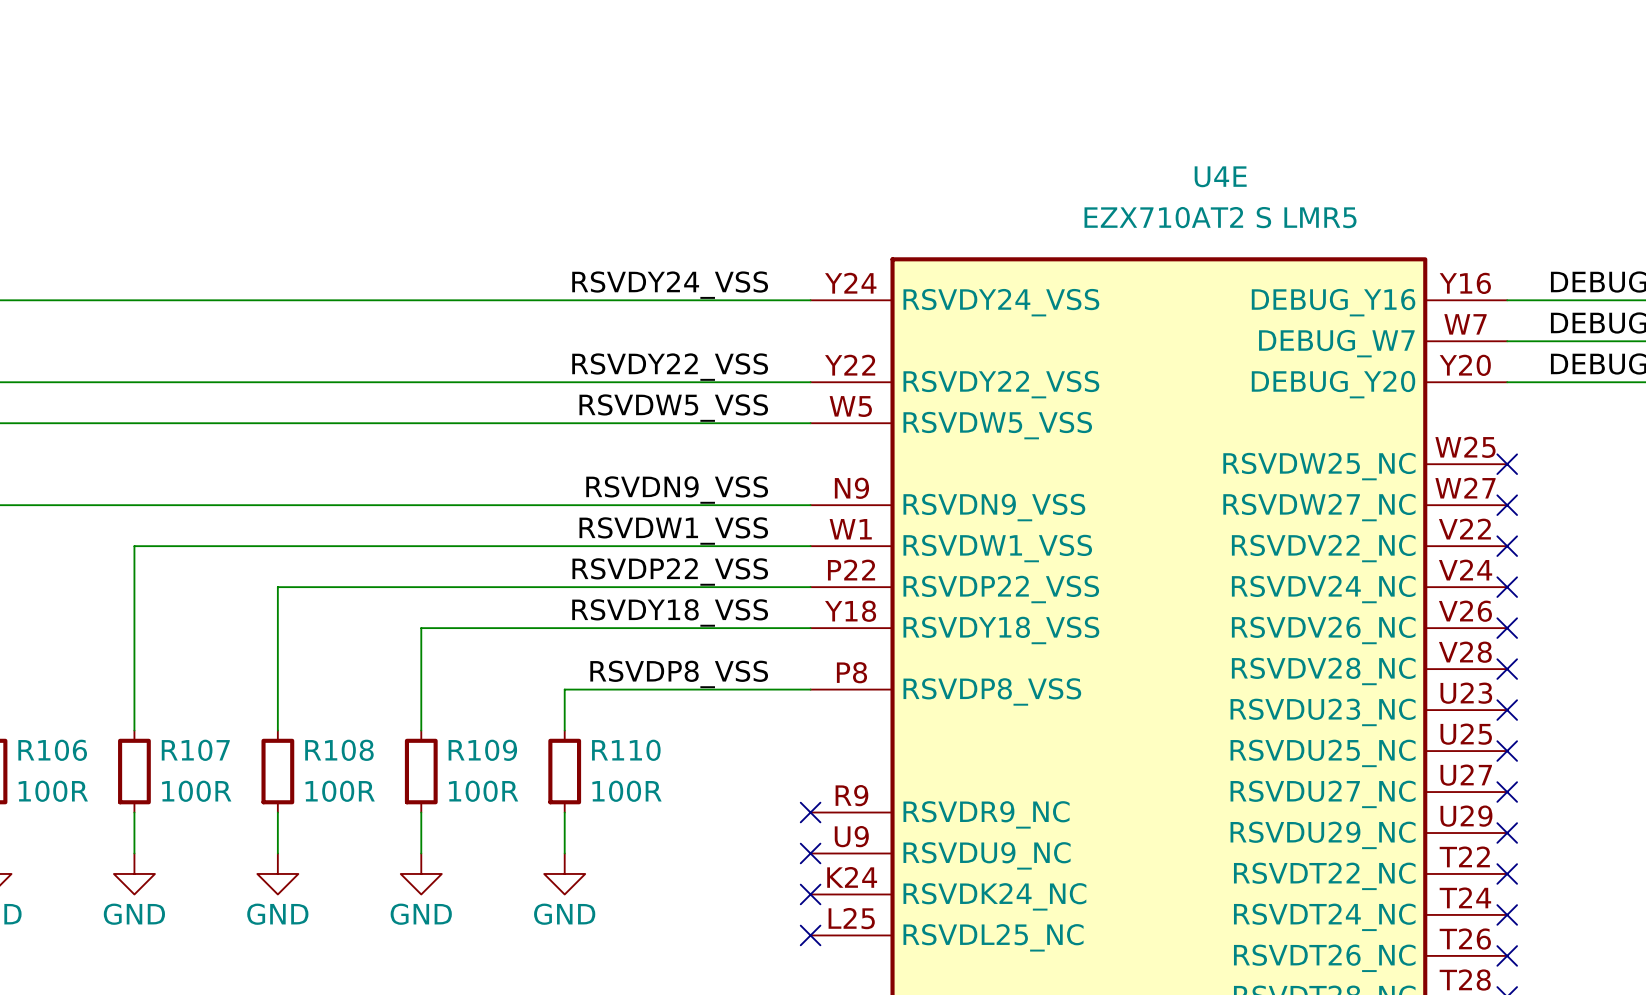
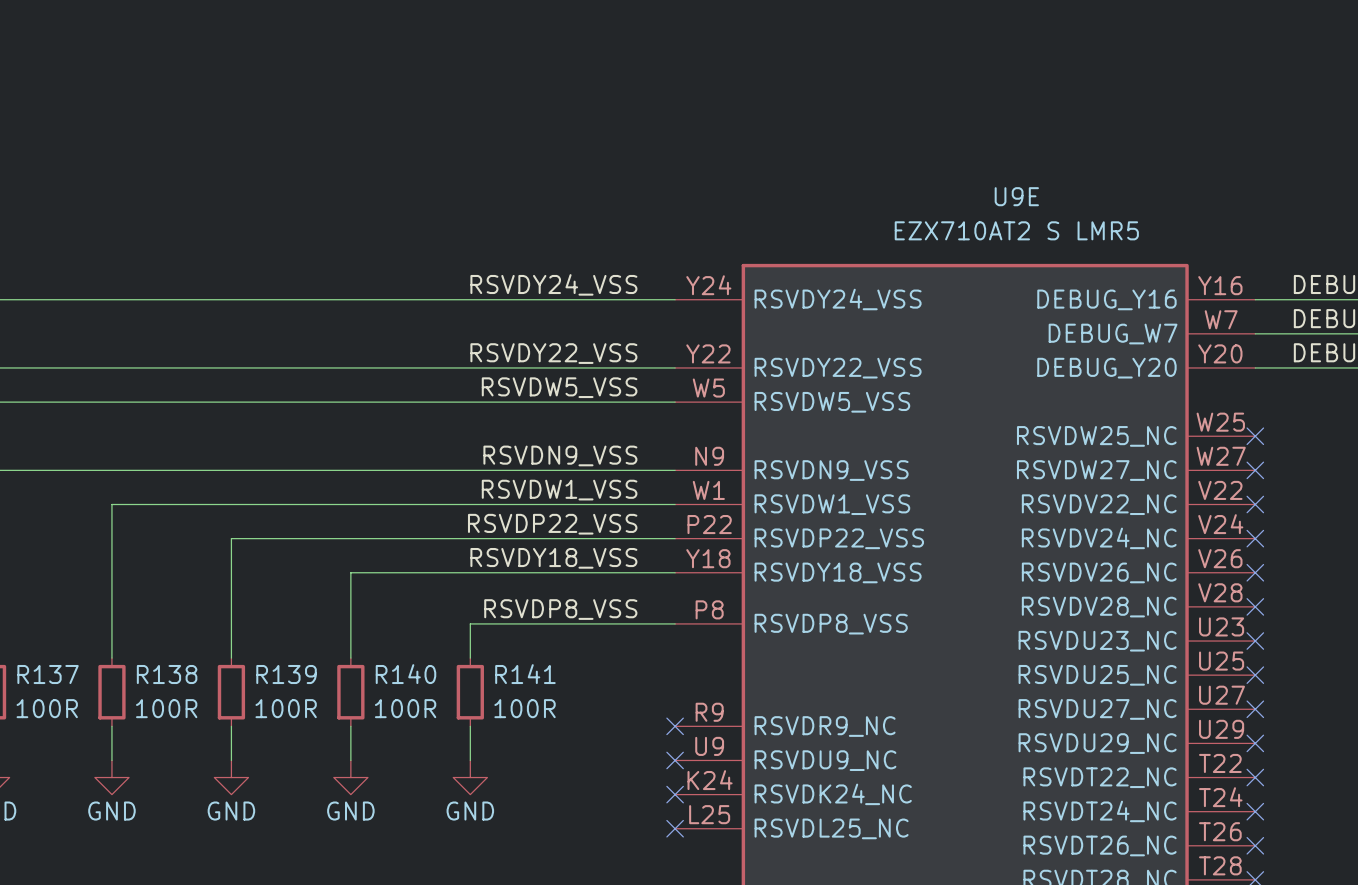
U4E name: U4E (1220, 176) -> U9E (1016, 196)
R106 name: R106 (52, 750) -> R137 (48, 674)
R107 name: R107 (195, 750) -> R138 (167, 674)
R108 name: R108 (339, 750) -> R139 (286, 674)
R109 name: R109 (482, 750) -> R140 (405, 674)
R110 name: R110 (626, 750) -> R141 (525, 674)

